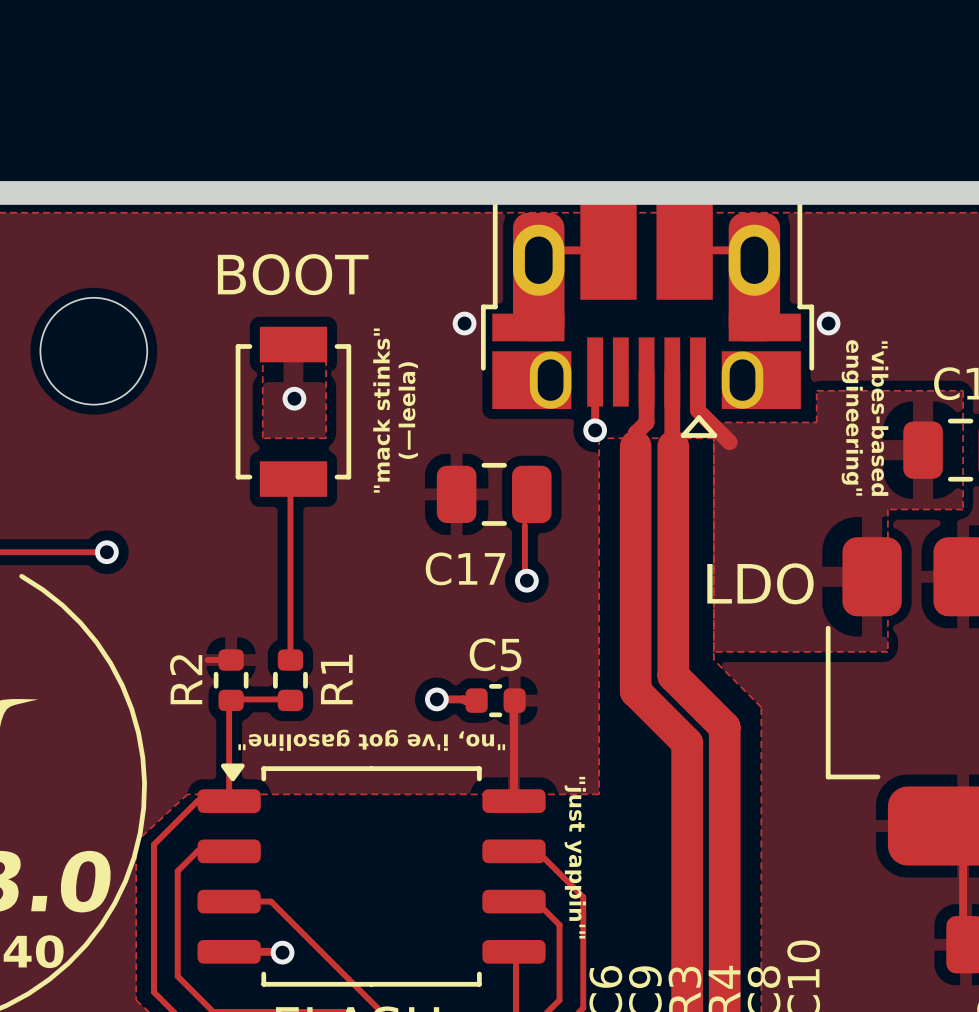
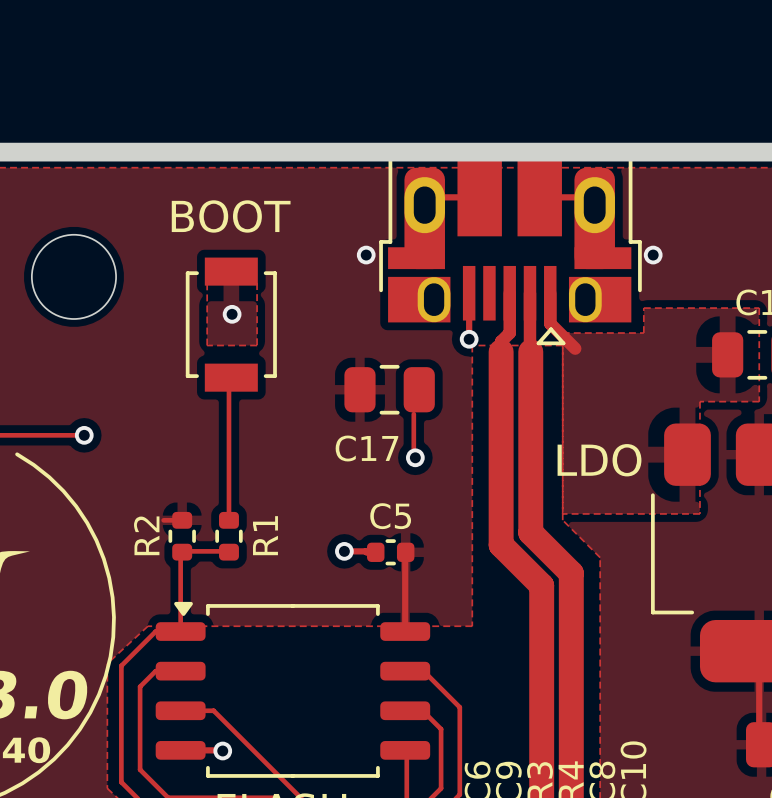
text: "mack stinks" (381, 410) -> none
text: (—leela) (408, 410) -> none
text: engineering" (852, 417) -> none
text: "vibes-based (879, 418) -> none
text: "no, i've got gasoline" (371, 740) -> none
text: "just yappin'" (575, 857) -> none

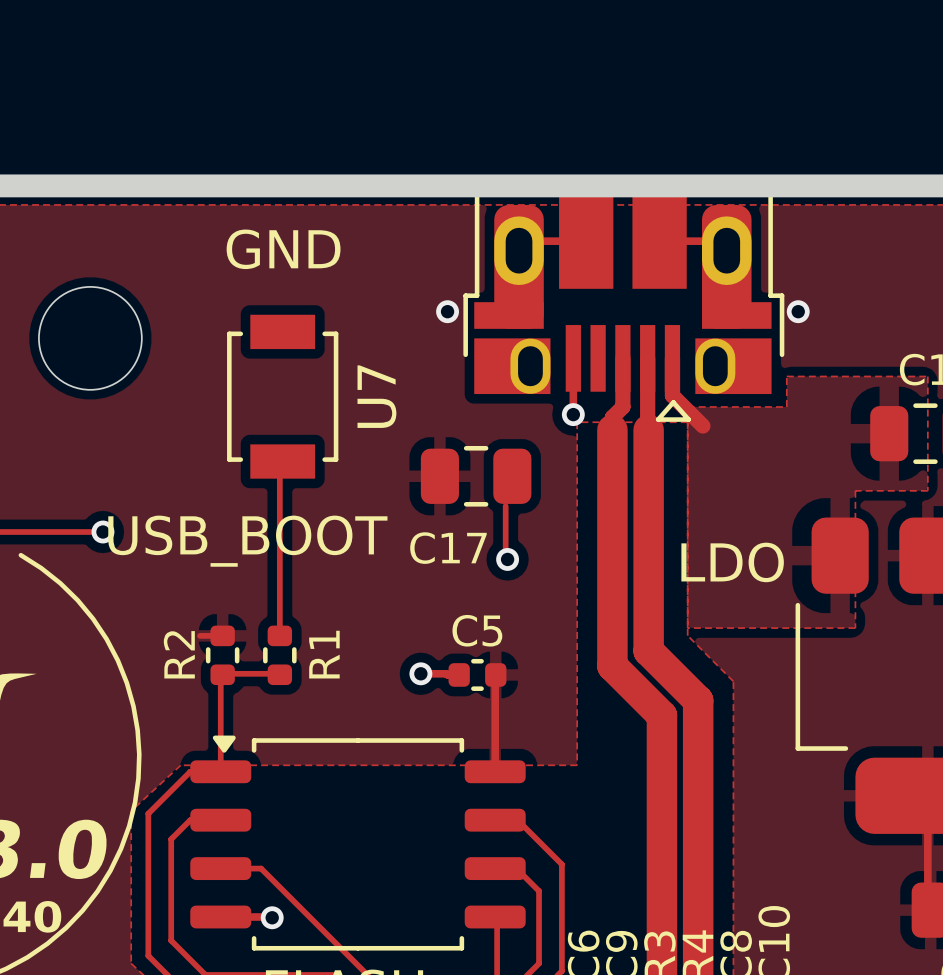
text: BOOT (231, 216) -> GND (283, 249)
zone outline: (207, 283) (257, 283) (257, 345) (207, 345) (207, 283) -> none
via: (232, 314) -> none
U7 name: none -> U7 (376, 396)
text: none -> USB_BOOT (247, 541)

